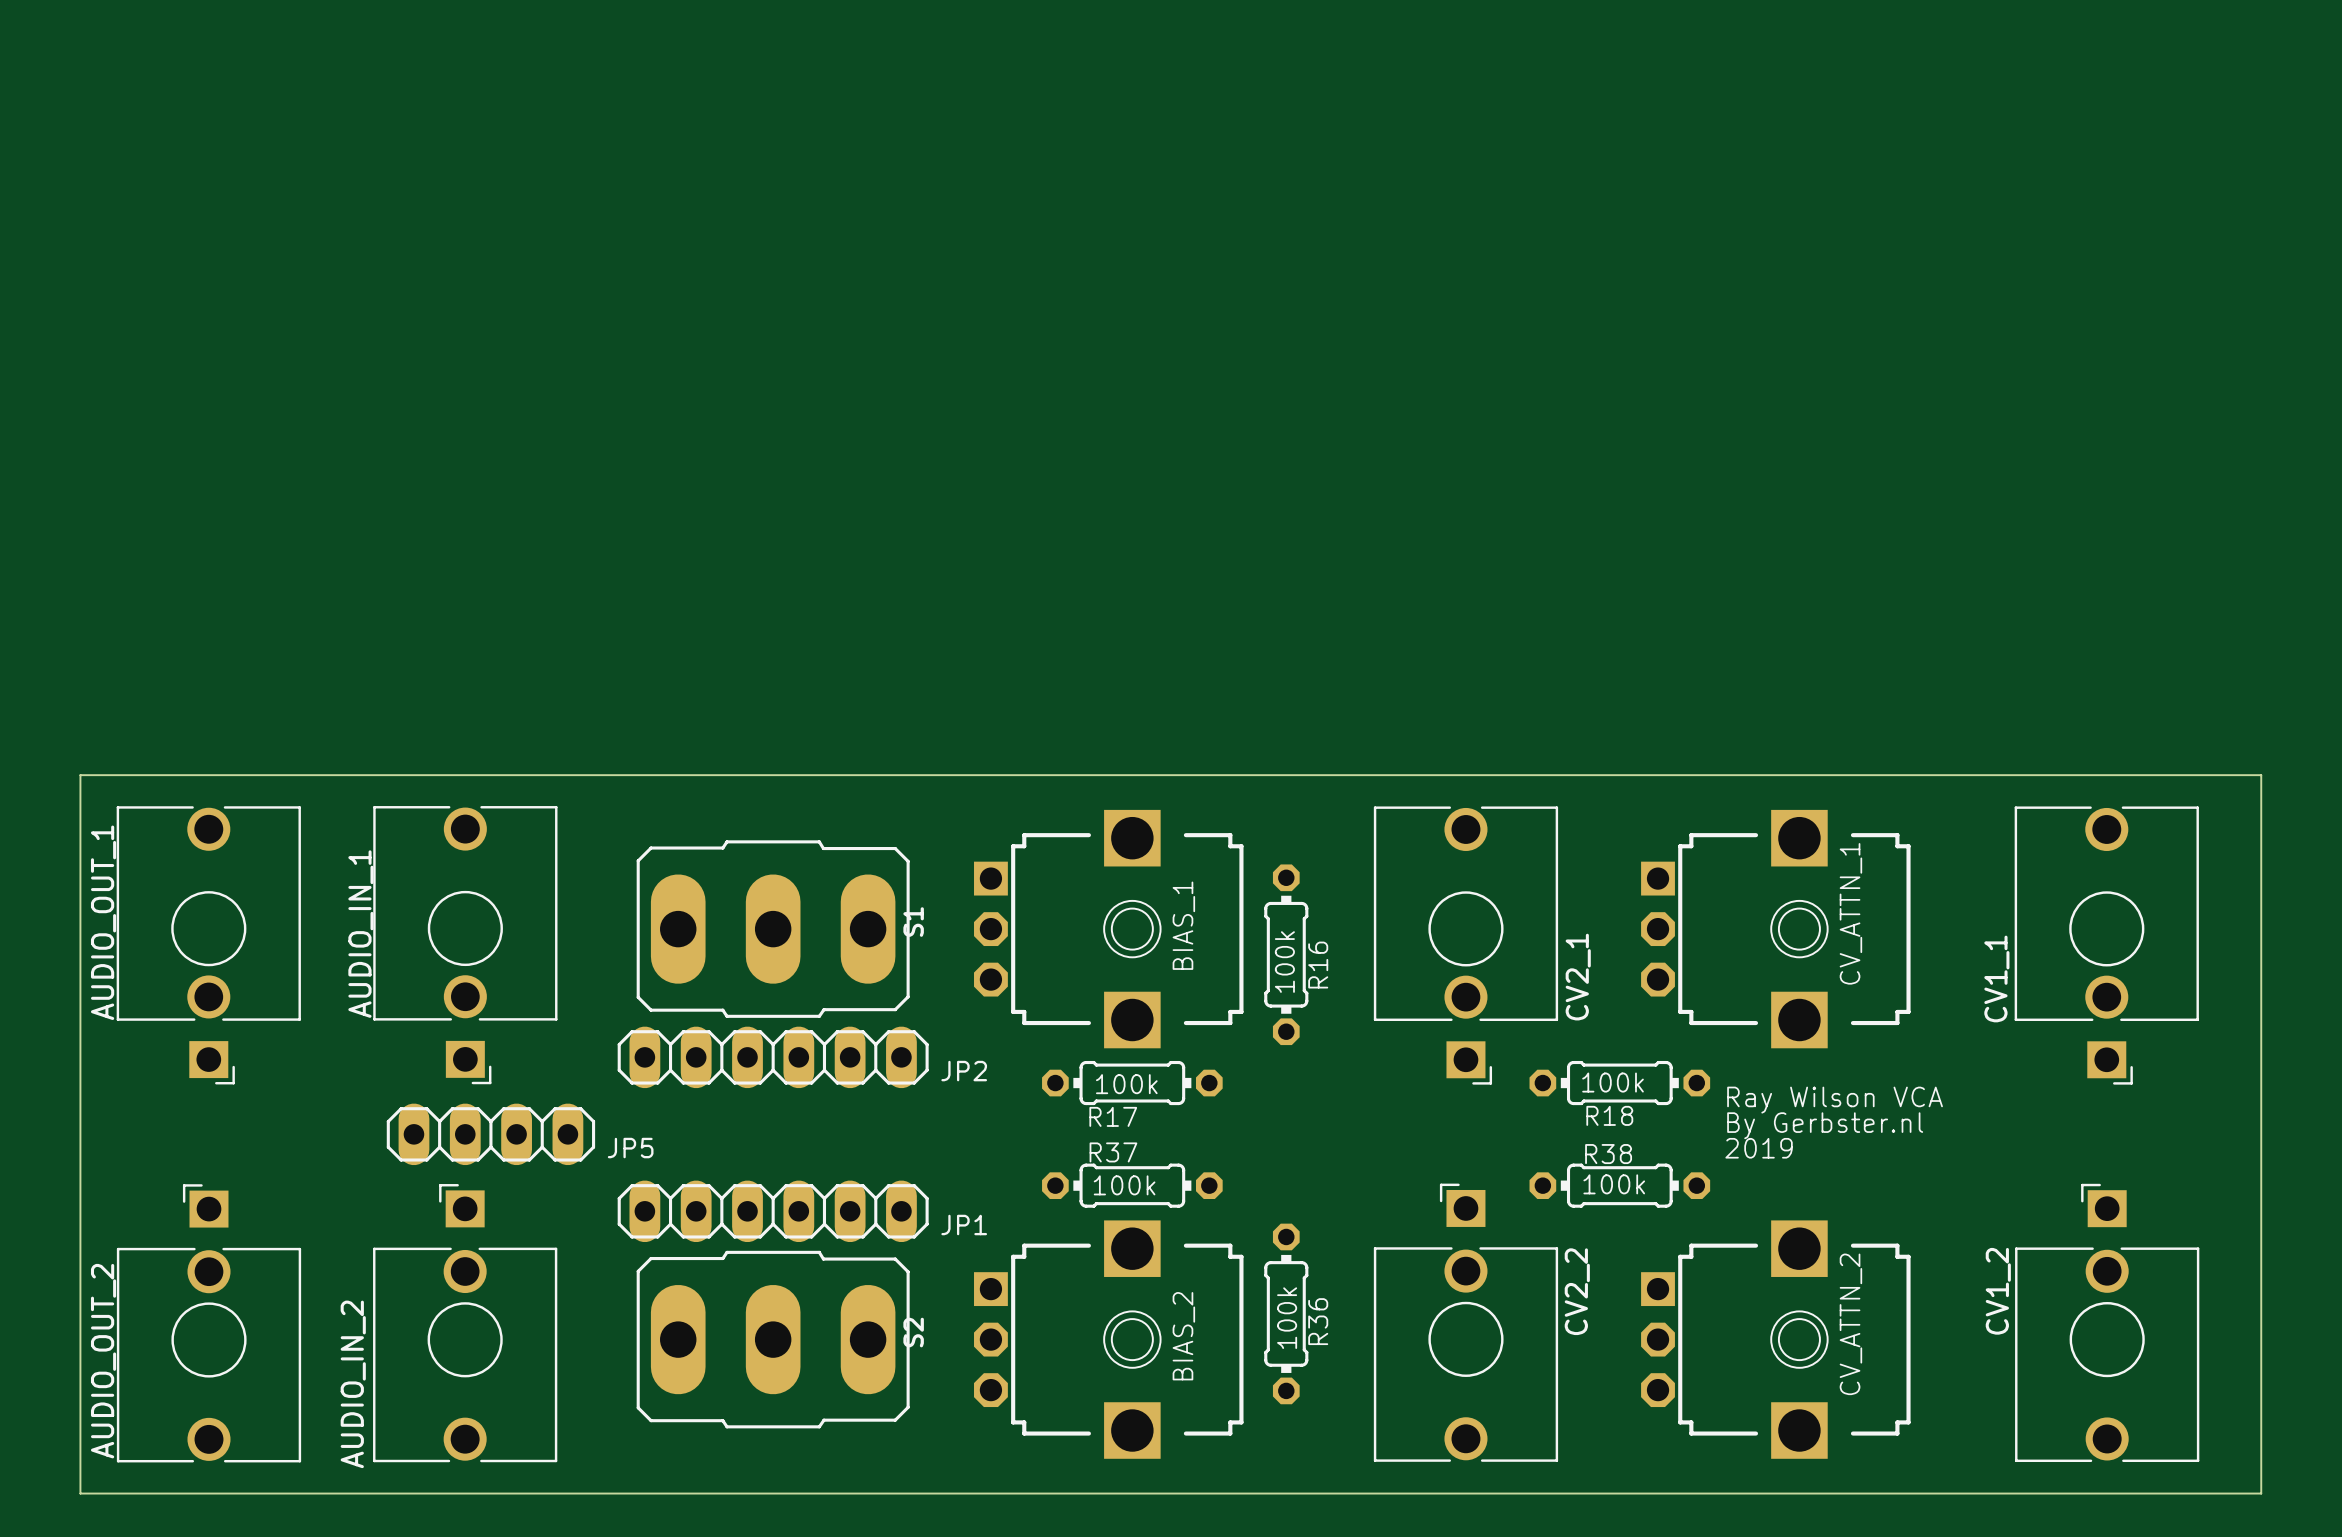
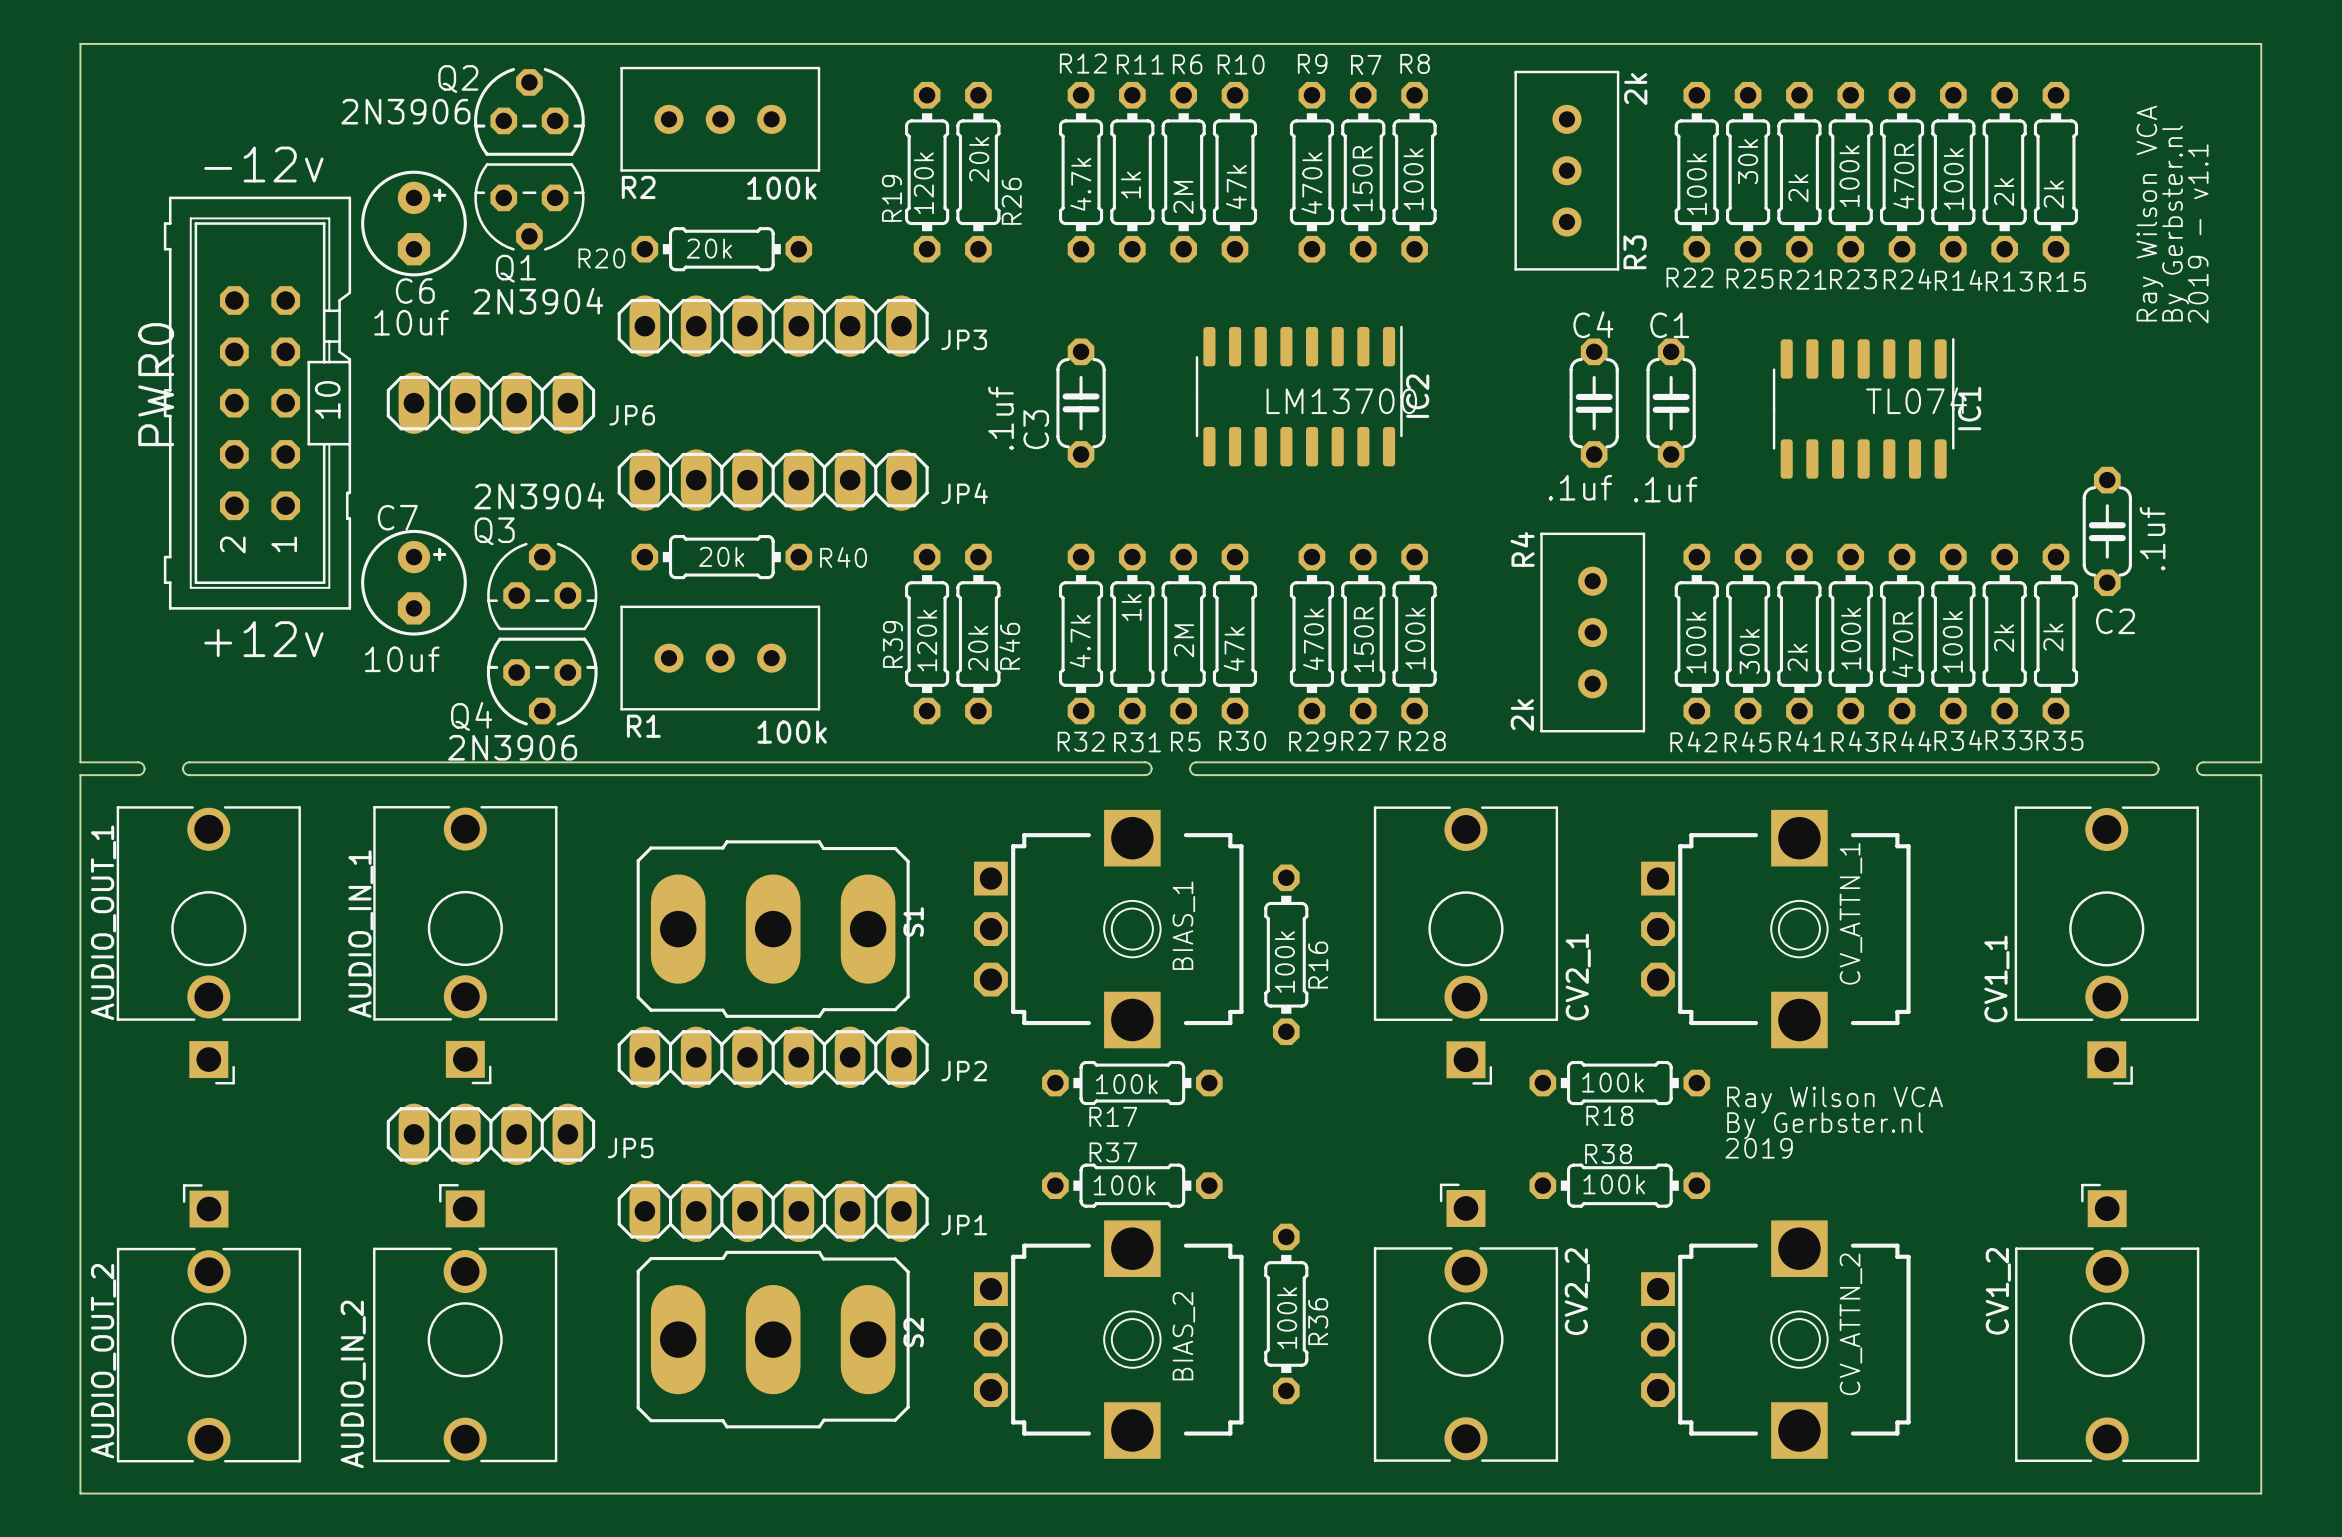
Q2: none -> 2N3906 (529, 111)
R2: none -> 100k (720, 119)
text: none -> -12v (263, 164)
R3: none -> 2k (1566, 170)
R19: none -> 120k (927, 172)
R26: none -> 20k (978, 172)
R12: none -> 4.7k (1081, 172)
R11: none -> 1k (1132, 172)
R6: none -> 2M (1183, 172)
R10: none -> 47k (1234, 172)
R9: none -> 470k (1311, 172)
R7: none -> 150R (1363, 172)
R8: none -> 100k (1414, 172)
R22: none -> 100k (1696, 172)
R25: none -> 30k (1748, 172)
R21: none -> 2k (1799, 172)
R23: none -> 100k (1850, 172)
R24: none -> 470R (1902, 172)
R14: none -> 100k (1953, 172)
R13: none -> 2k (2004, 172)
R15: none -> 2k (2055, 172)
Q1: none -> 2N3904 (529, 206)
text: none -> Ray Wilson VCA (2150, 213)
C6: none -> 10uf (413, 223)
text: none -> By Gerbster.nl (2175, 223)
text: none -> 2019 - v1.1 (2198, 233)
R20: none -> 20k (721, 249)
JP3: none -> (773, 326)
IC2: none -> (1299, 396)
text: none -> TL074 (1916, 400)
text: none -> LM13700 (1341, 401)
PWR0: none -> (257, 403)
JP6: none -> (490, 403)
C3: none -> .1uf (1081, 403)
C4: none -> .1uf (1594, 403)
C1: none -> .1uf (1671, 403)
IC1: none -> (1863, 408)
JP4: none -> (773, 480)
C2: none -> .1uf (2107, 531)
R40: none -> 20k (721, 557)
C7: none -> 10uf (413, 582)
Q3: none -> 2N3904 (542, 586)
R4: none -> 2k (1592, 632)
R39: none -> 120k (927, 634)
R46: none -> 20k (978, 634)
R32: none -> 4.7k (1081, 634)
R31: none -> 1k (1132, 634)
R5: none -> 2M (1183, 634)
R30: none -> 47k (1234, 634)
R29: none -> 470k (1311, 634)
R27: none -> 150R (1363, 634)
R28: none -> 100k (1414, 634)
R42: none -> 100k (1696, 634)
R45: none -> 30k (1748, 634)
R41: none -> 2k (1799, 634)
R43: none -> 100k (1850, 634)
R44: none -> 470R (1902, 634)
R34: none -> 100k (1953, 634)
R33: none -> 2k (2004, 634)
R35: none -> 2k (2055, 634)
text: none -> +12v (263, 639)
R1: none -> 100k (720, 658)
Q4: none -> 2N3906 (542, 681)
board edge: (138, 775) (189, 775) -> (1145, 775) (1149, 773) (1151, 768) (1149, 764) (1145, 762) (189, 762) (184, 764) (183, 768) (184, 773) (189, 775)
board edge: (1145, 775) (1196, 775) -> (2152, 775) (2156, 773) (2158, 768) (2156, 764) (2152, 762) (1196, 762) (1191, 764) (1190, 768) (1191, 773) (1196, 775)
board edge: (2152, 775) (2203, 775) -> (138, 775) (142, 773) (144, 769) (143, 765) (139, 762) (80, 762) (80, 43) (2261, 43) (2261, 762) (2201, 762) (2197, 765) (2197, 769) (2199, 773) (2203, 775)

